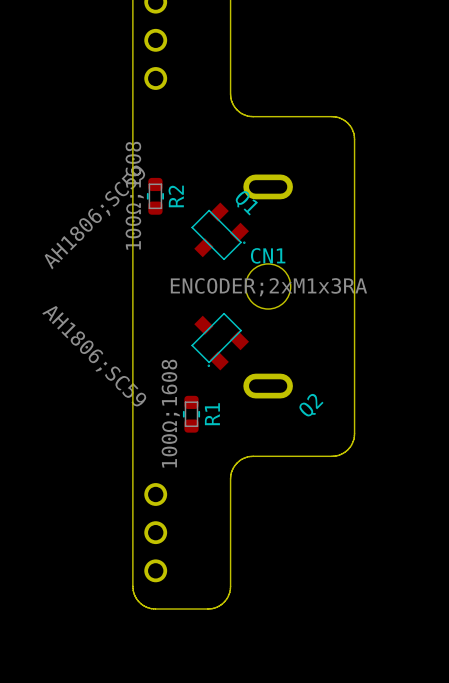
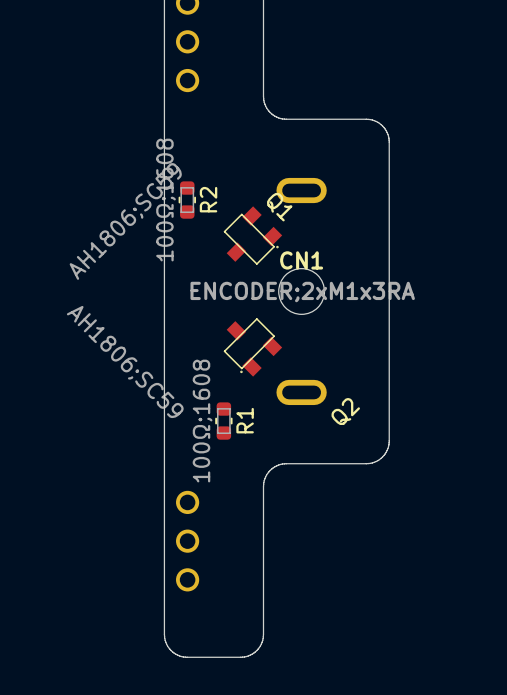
board edge: (132, 586) (134, 594) (139, 602) (147, 607) (155, 609) (213, 608) (226, 599) (230, 586) -> (164, 595) (165, 642) (174, 653) (187, 657) (244, 656) (255, 651) (263, 638) (263, 595)

